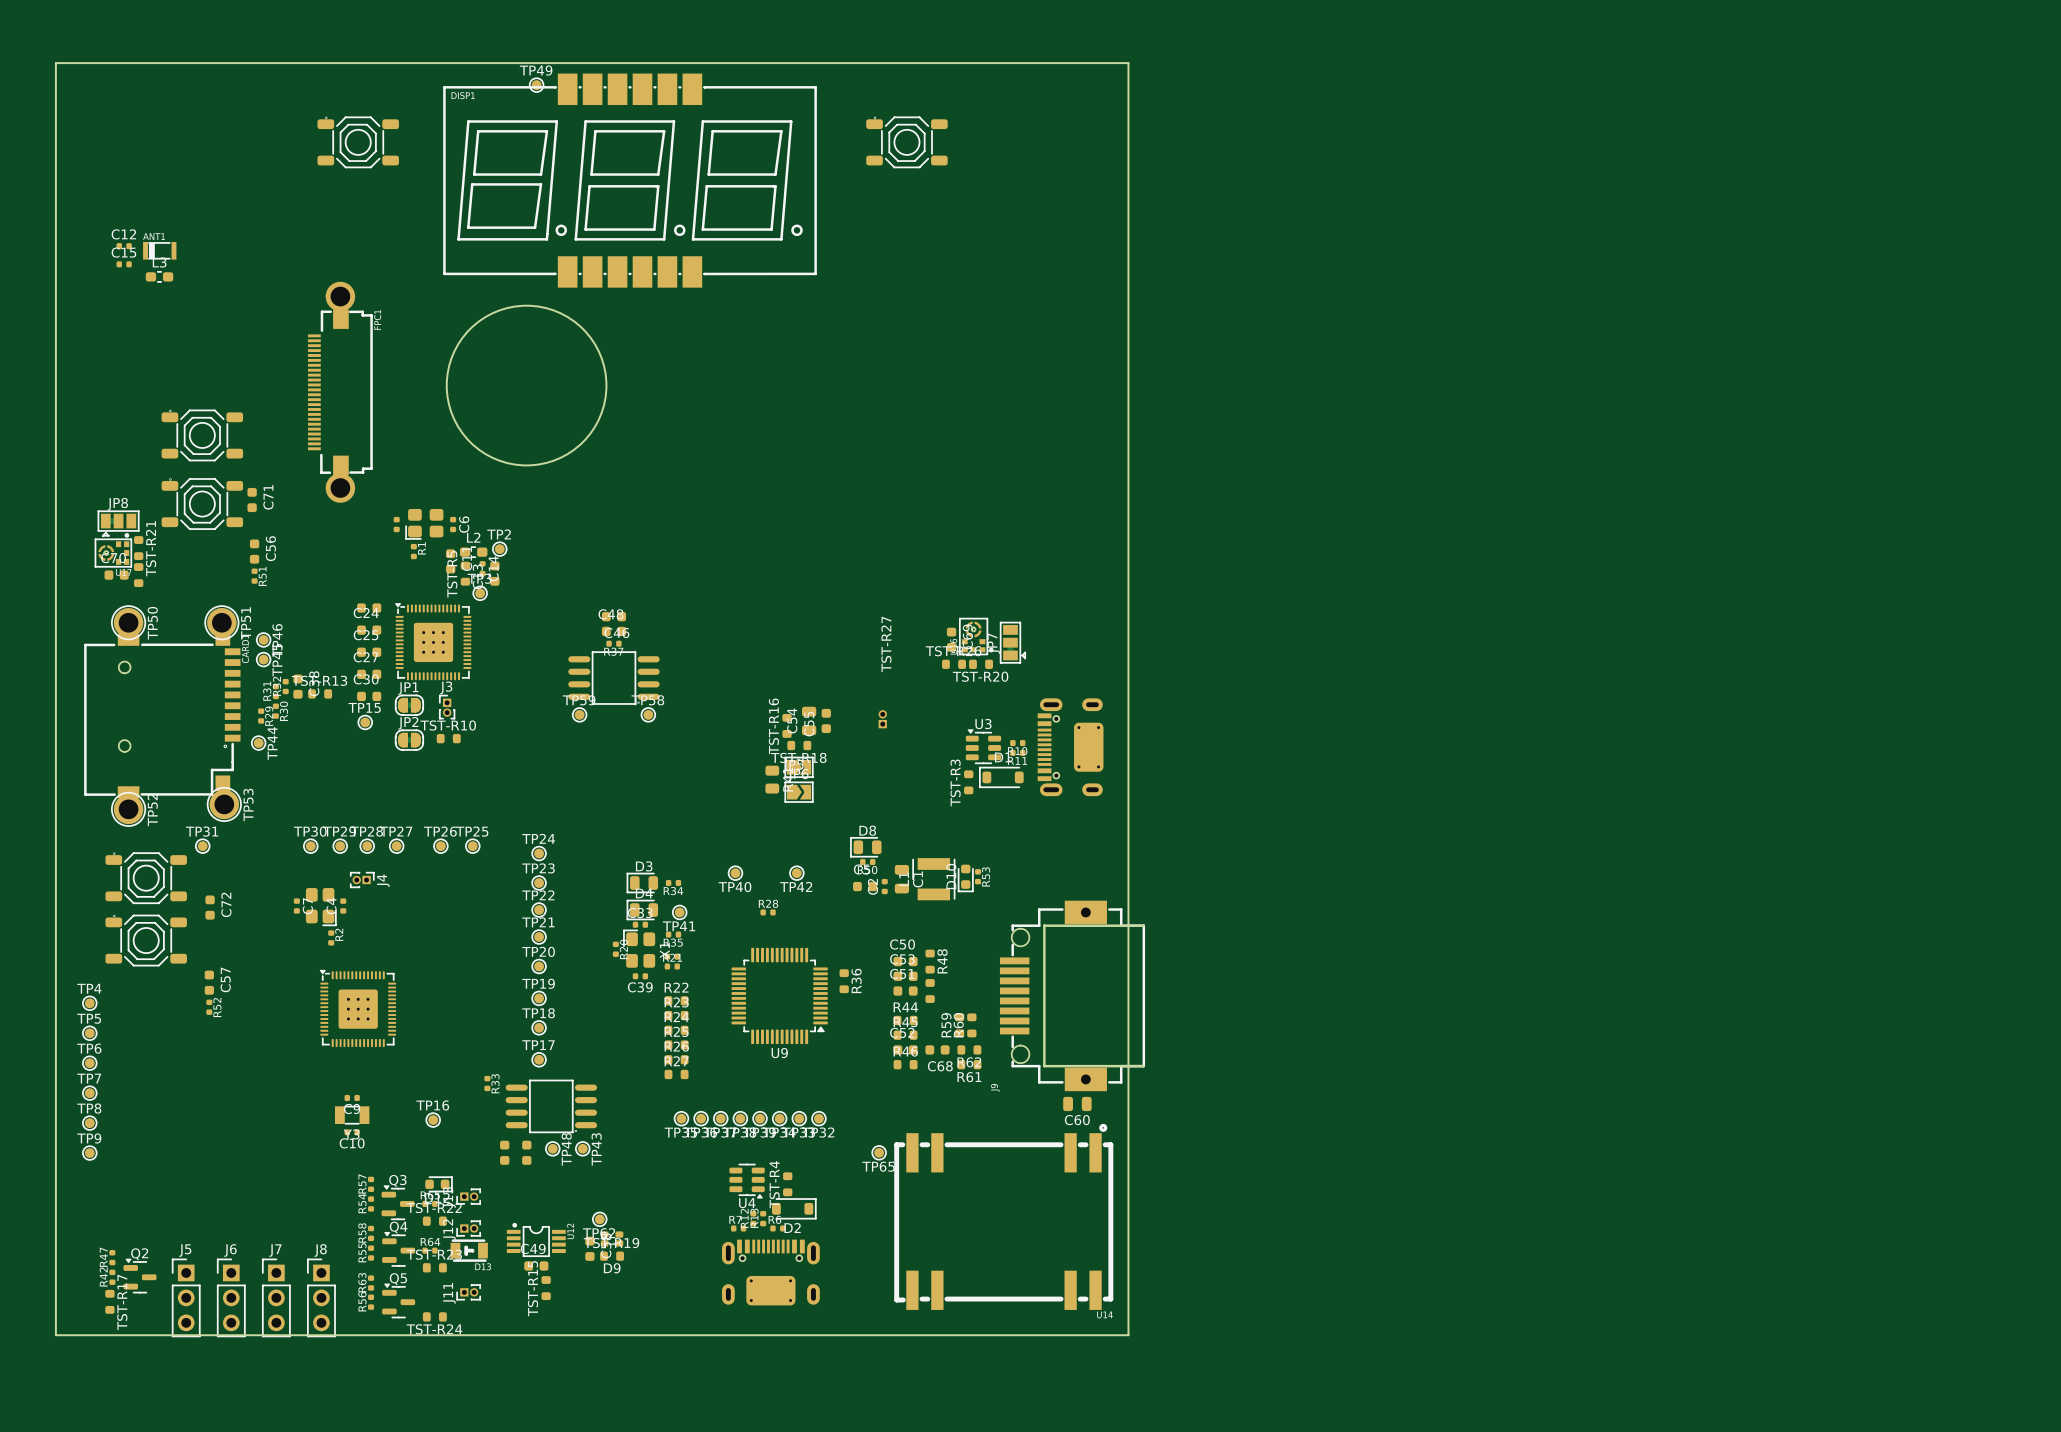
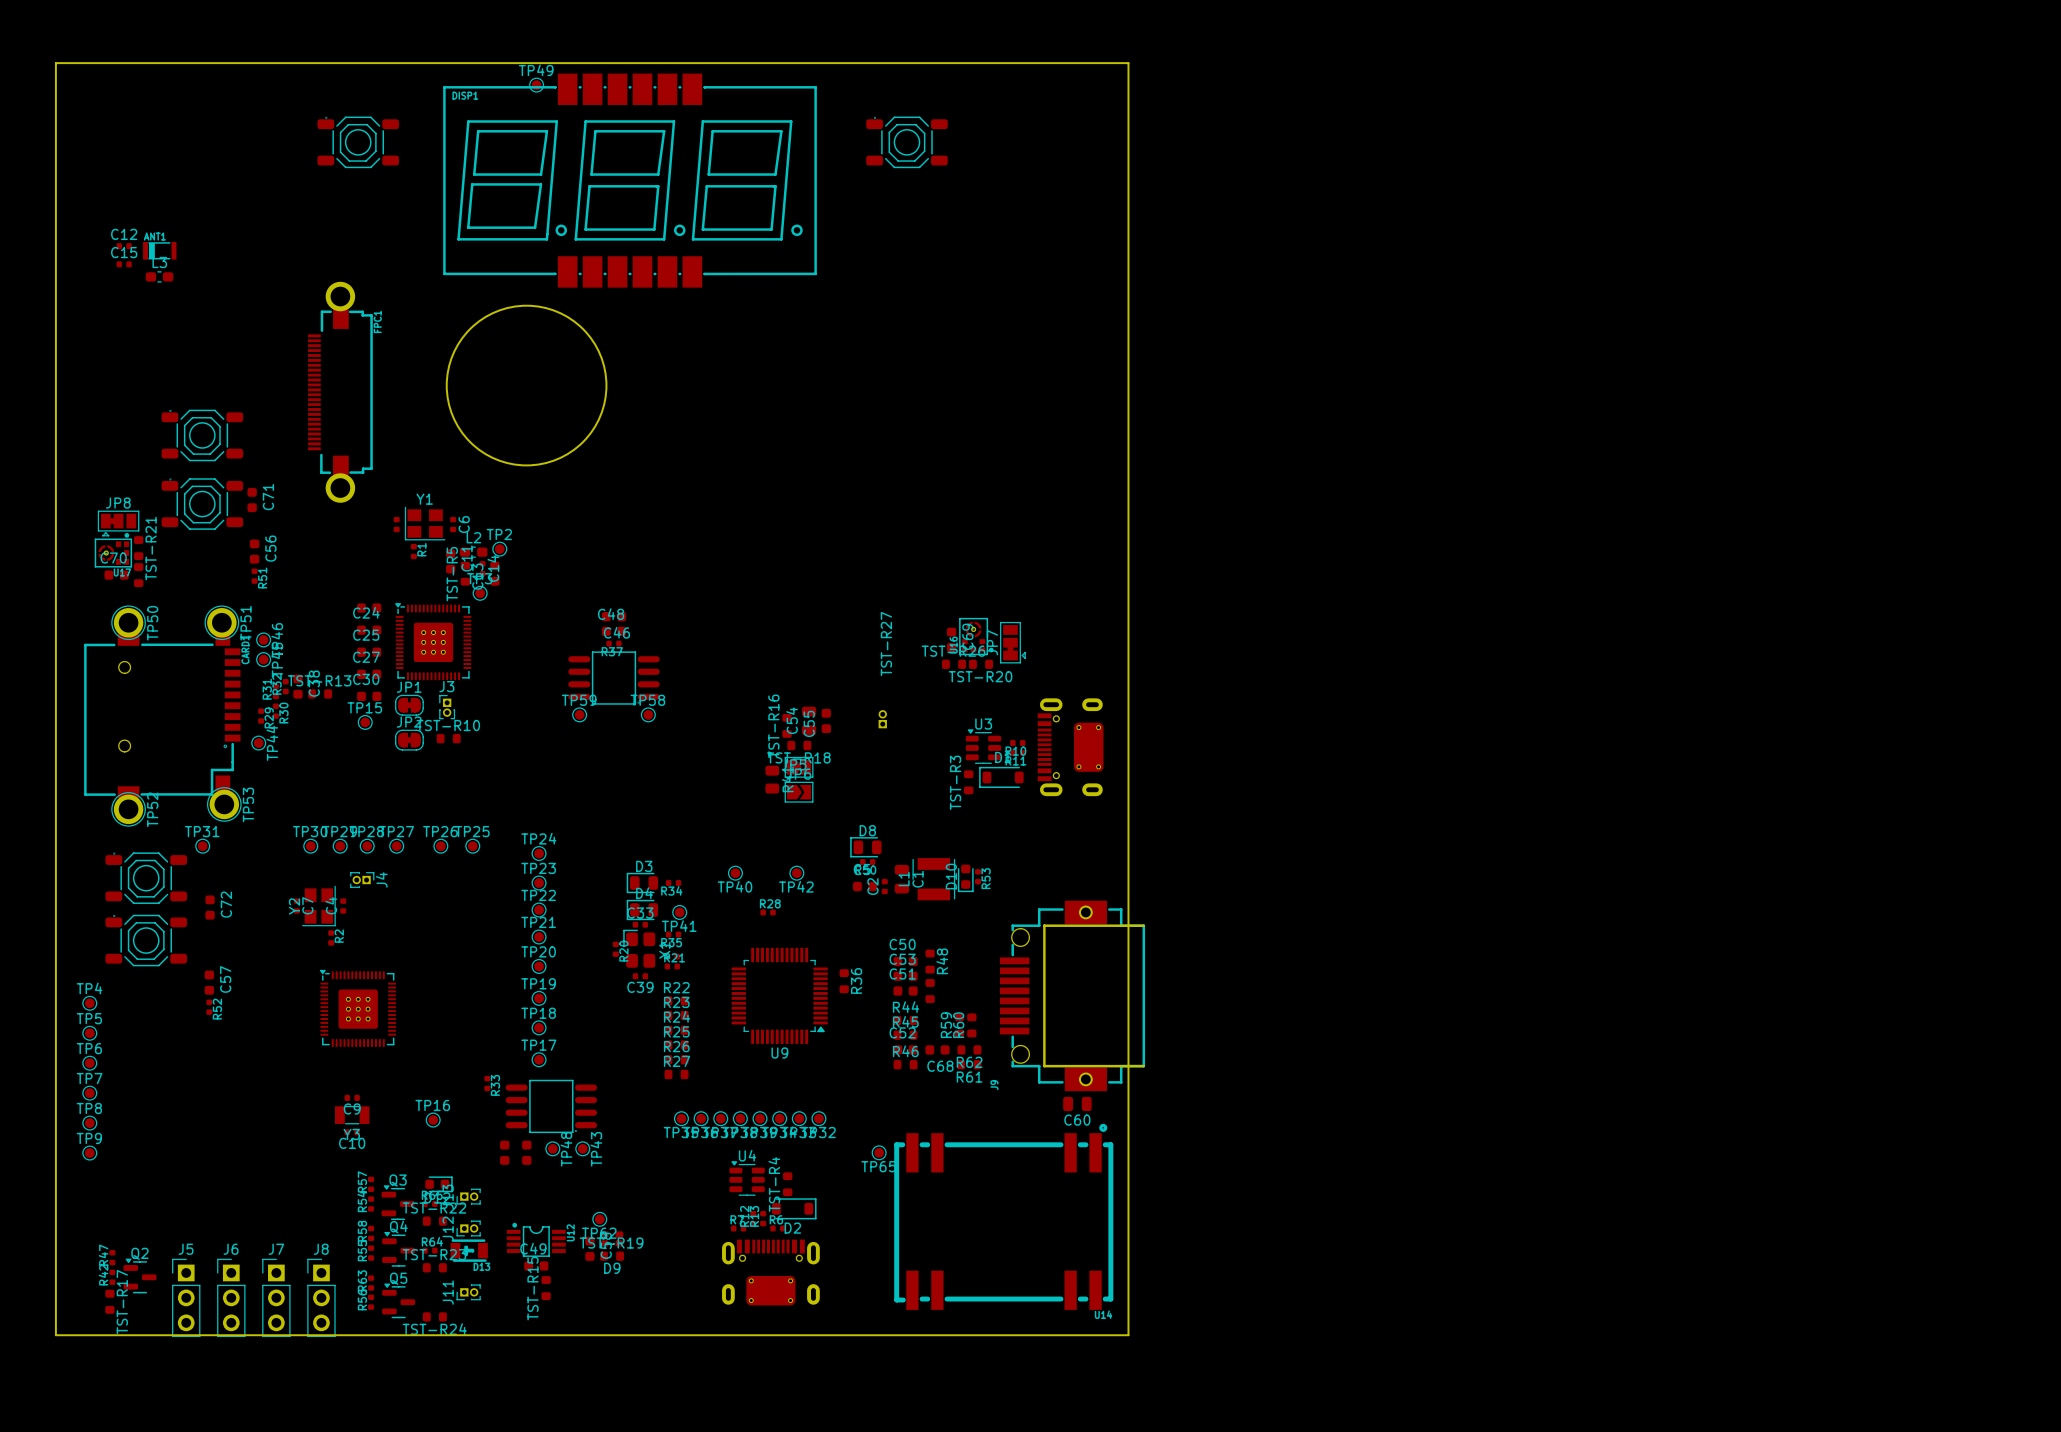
Y1: none -> (425, 523)
part: (424, 524) -> none
Y2: none -> (318, 906)
part: (321, 907) -> none
U4 rotation: 0° (747, 1181) -> 180° (747, 1178)

